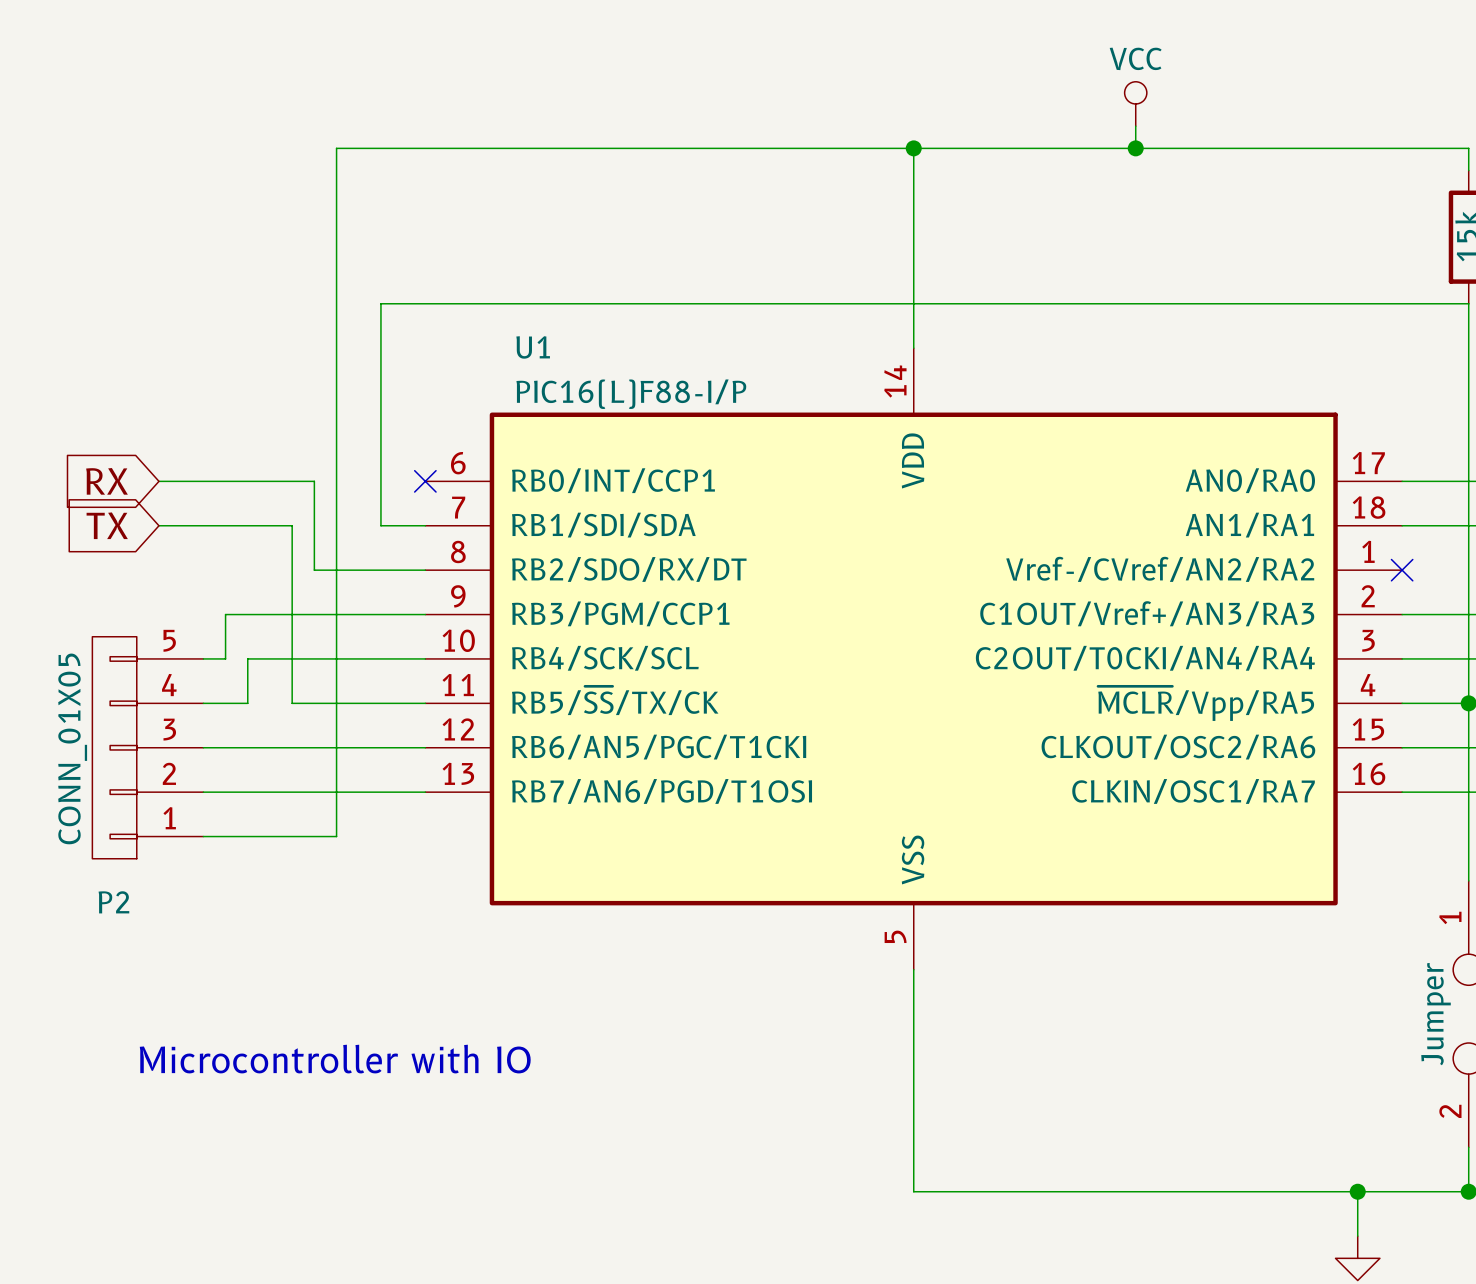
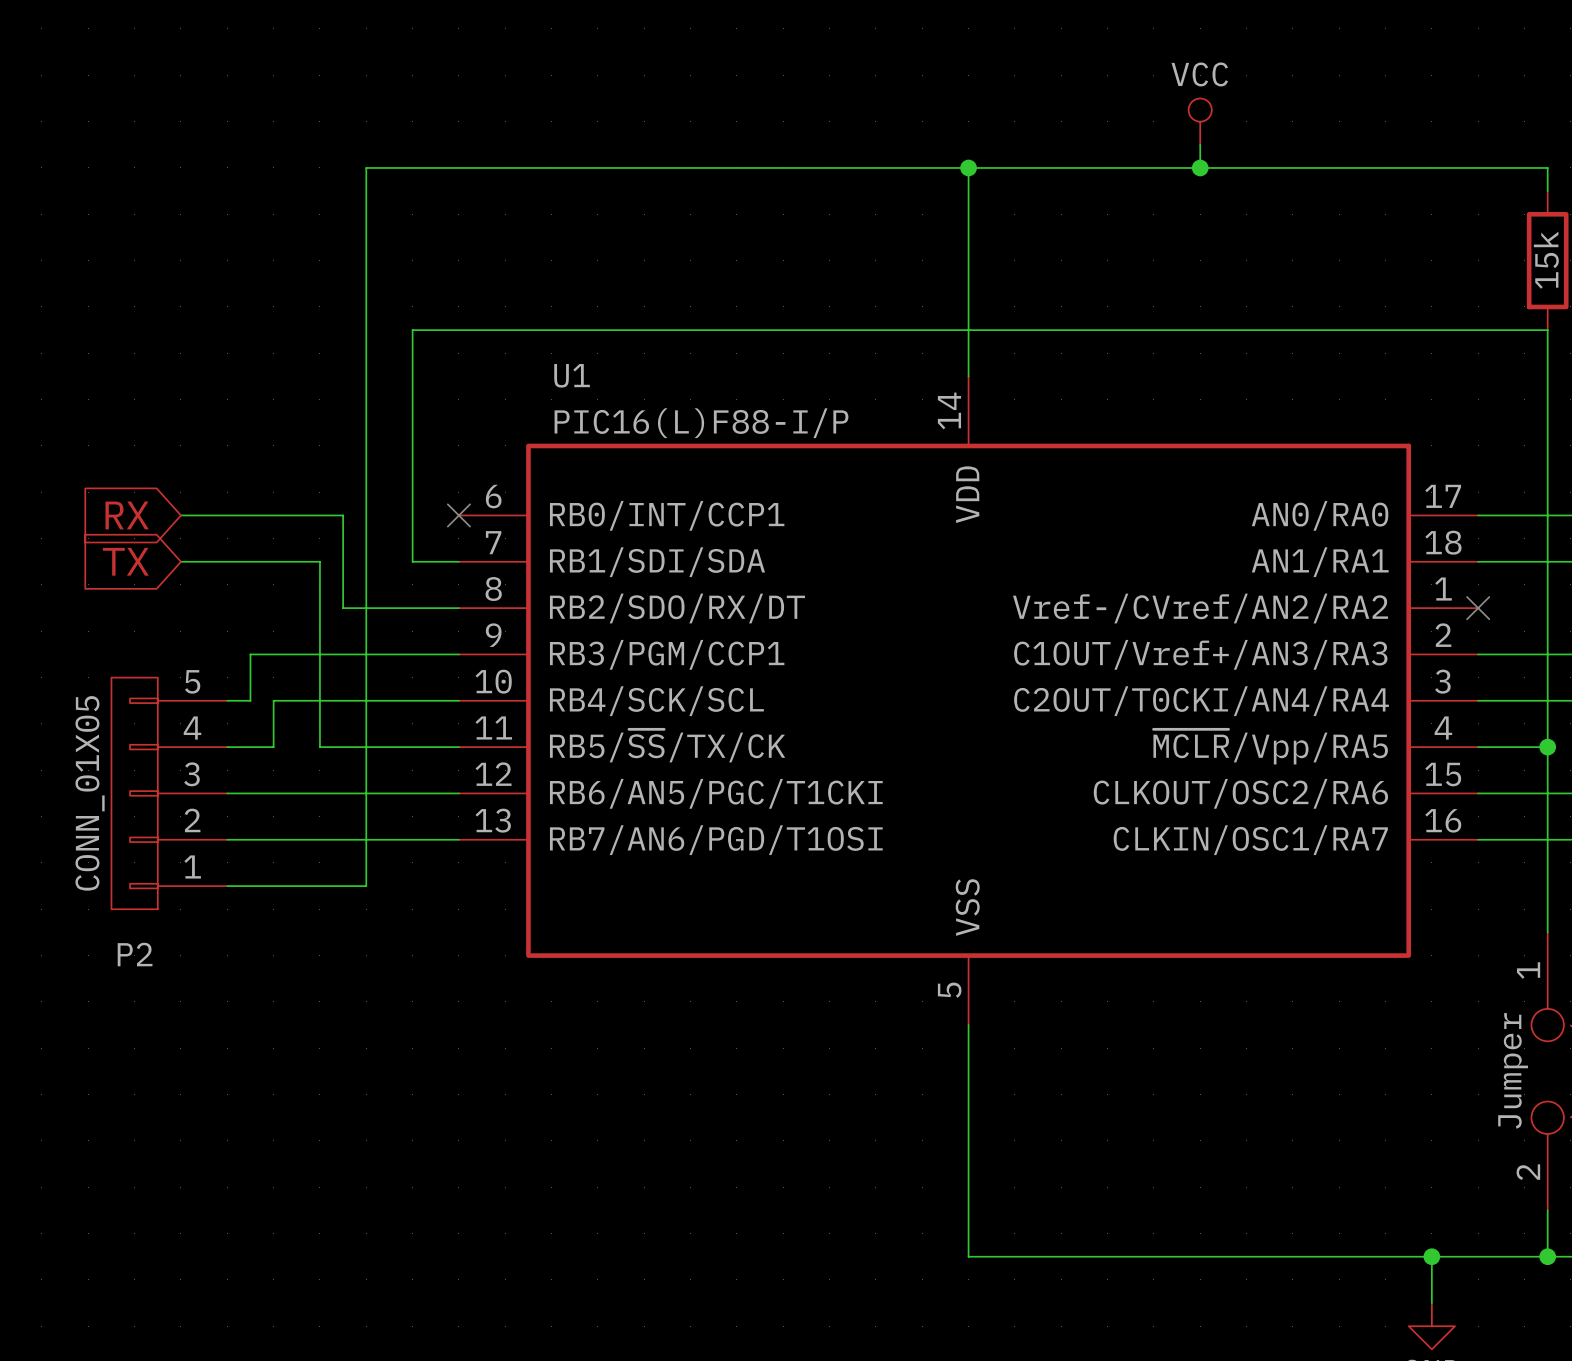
text: Microcontroller with IO (335, 1059) -> none

